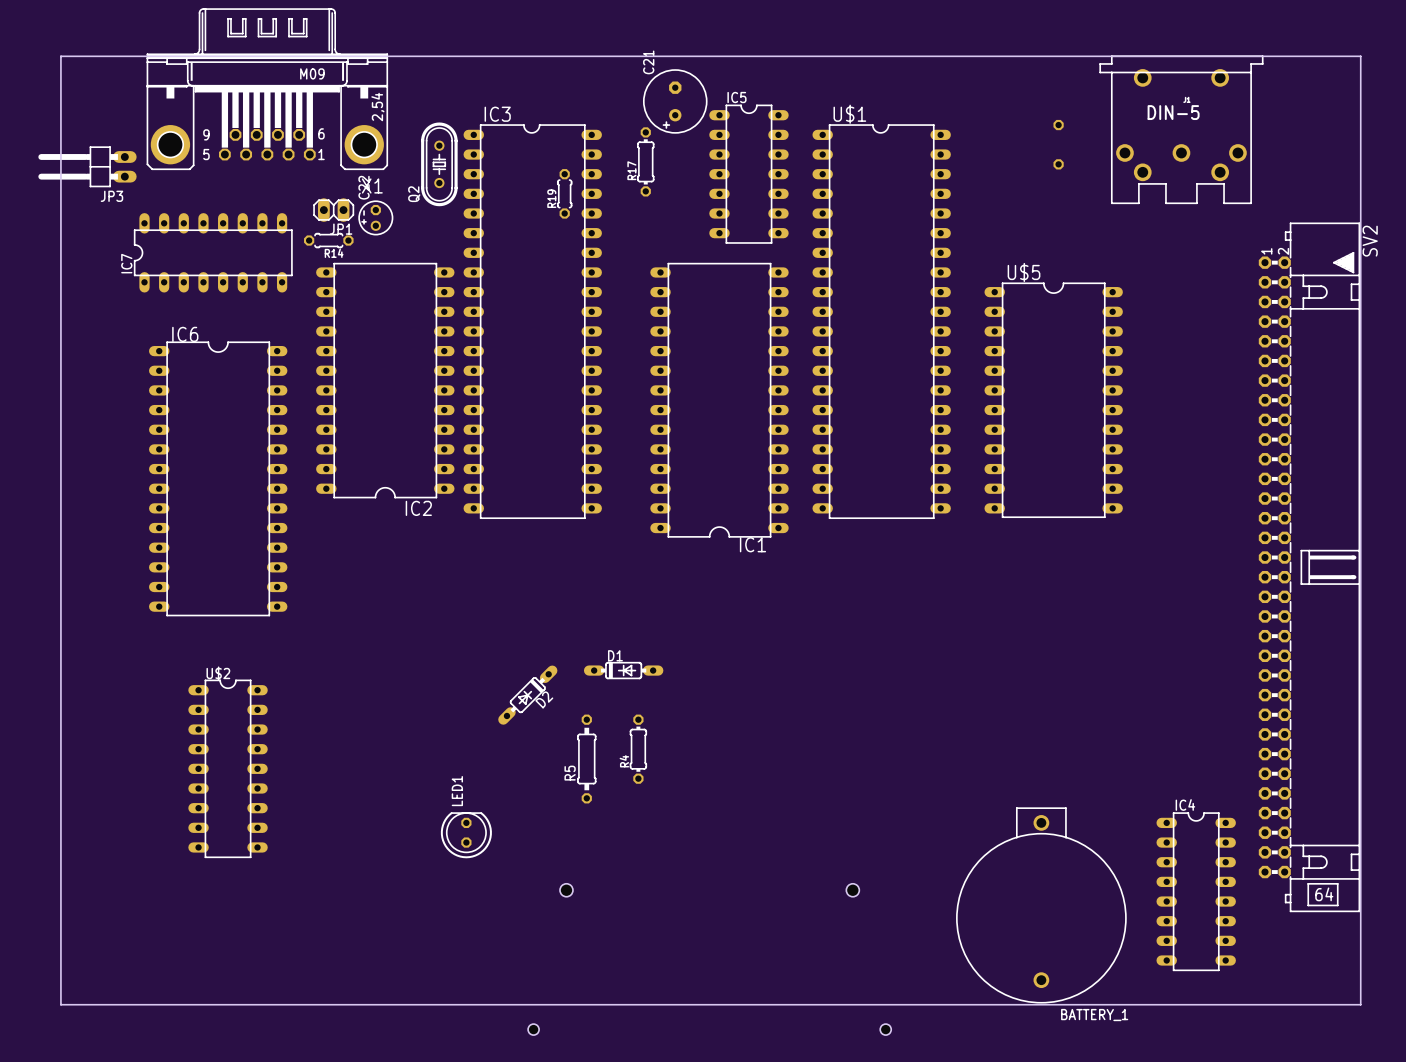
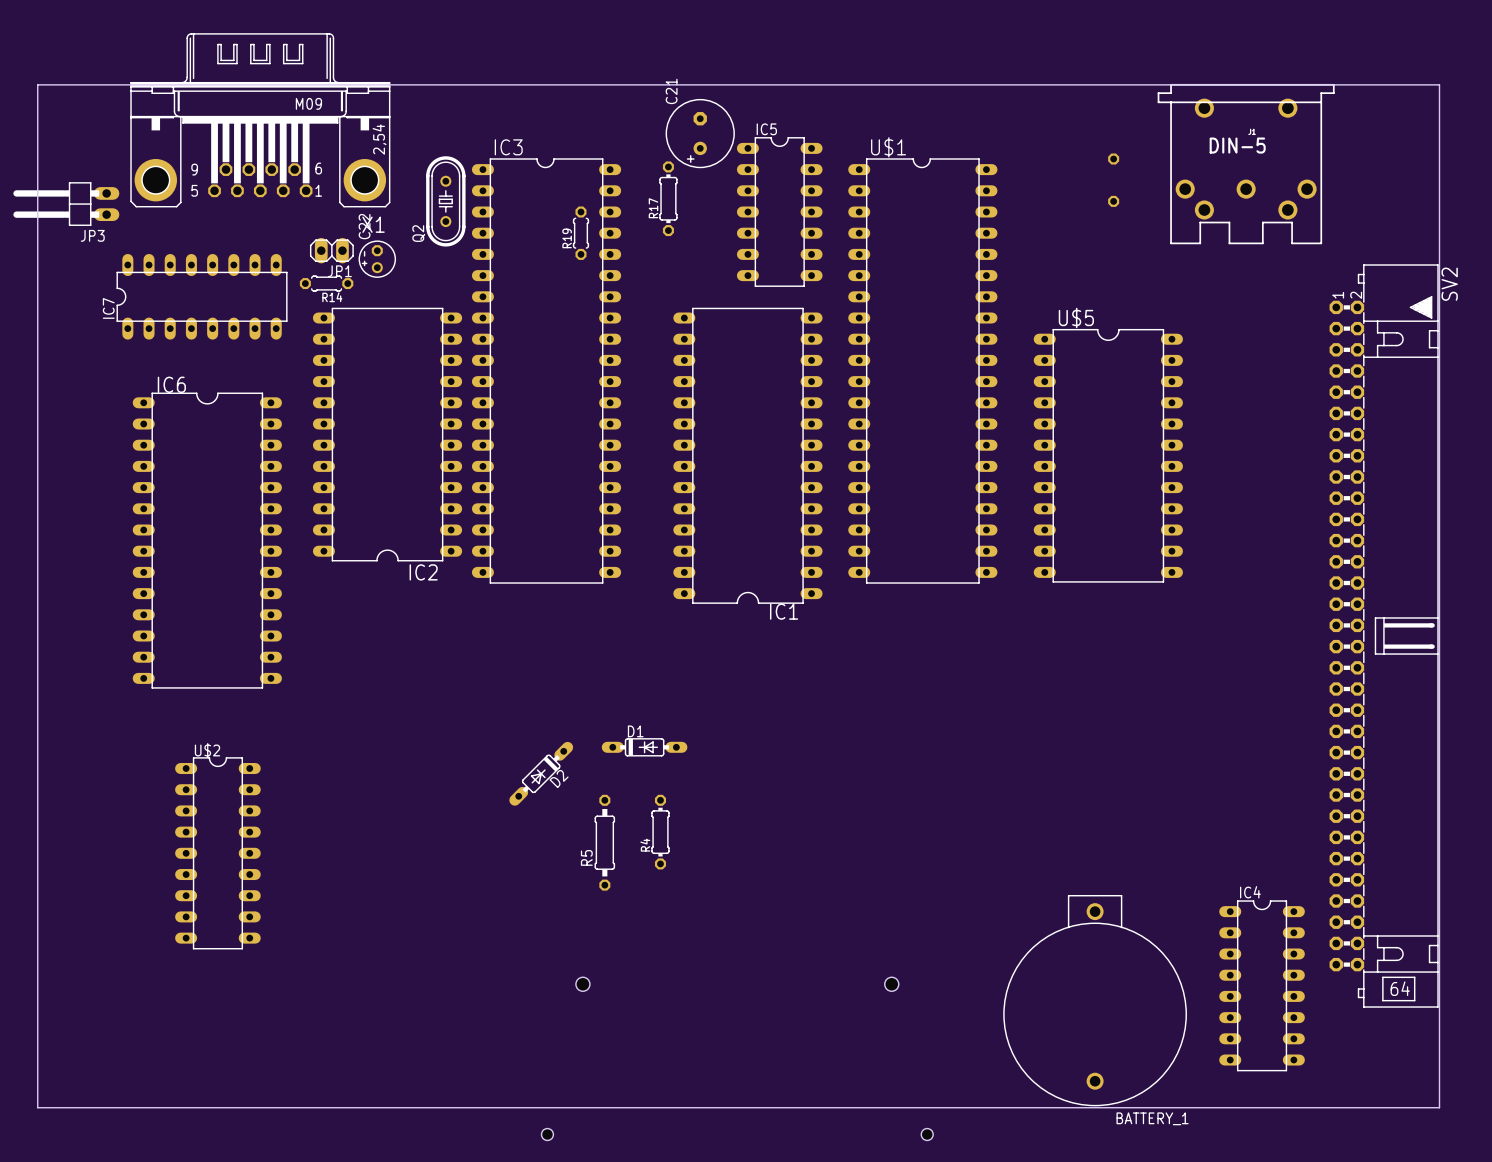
LED1: (466, 835) -> none

